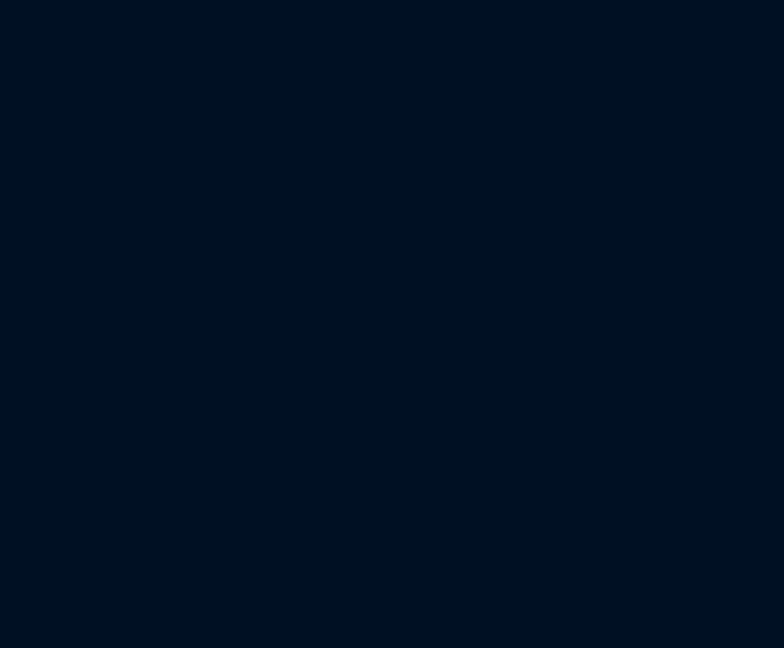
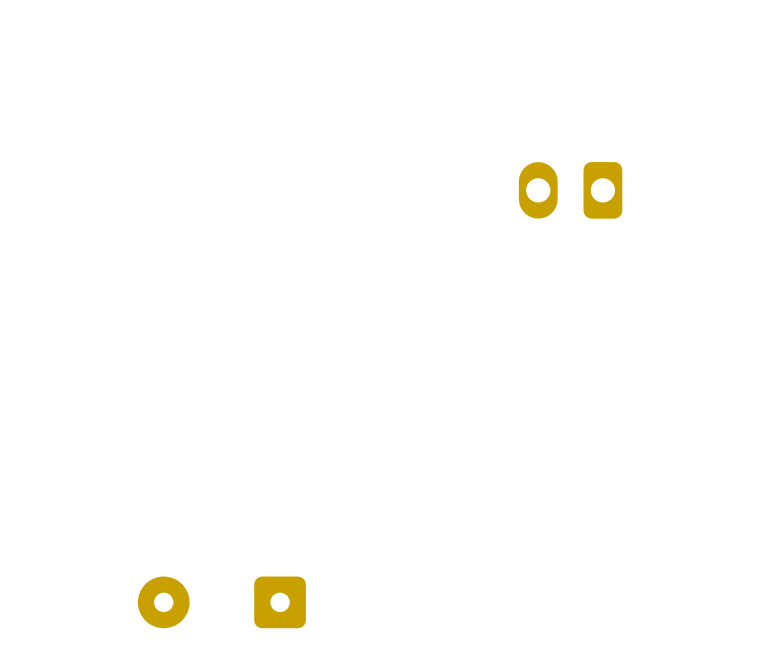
part: none -> (570, 190)
part: none -> (221, 602)

